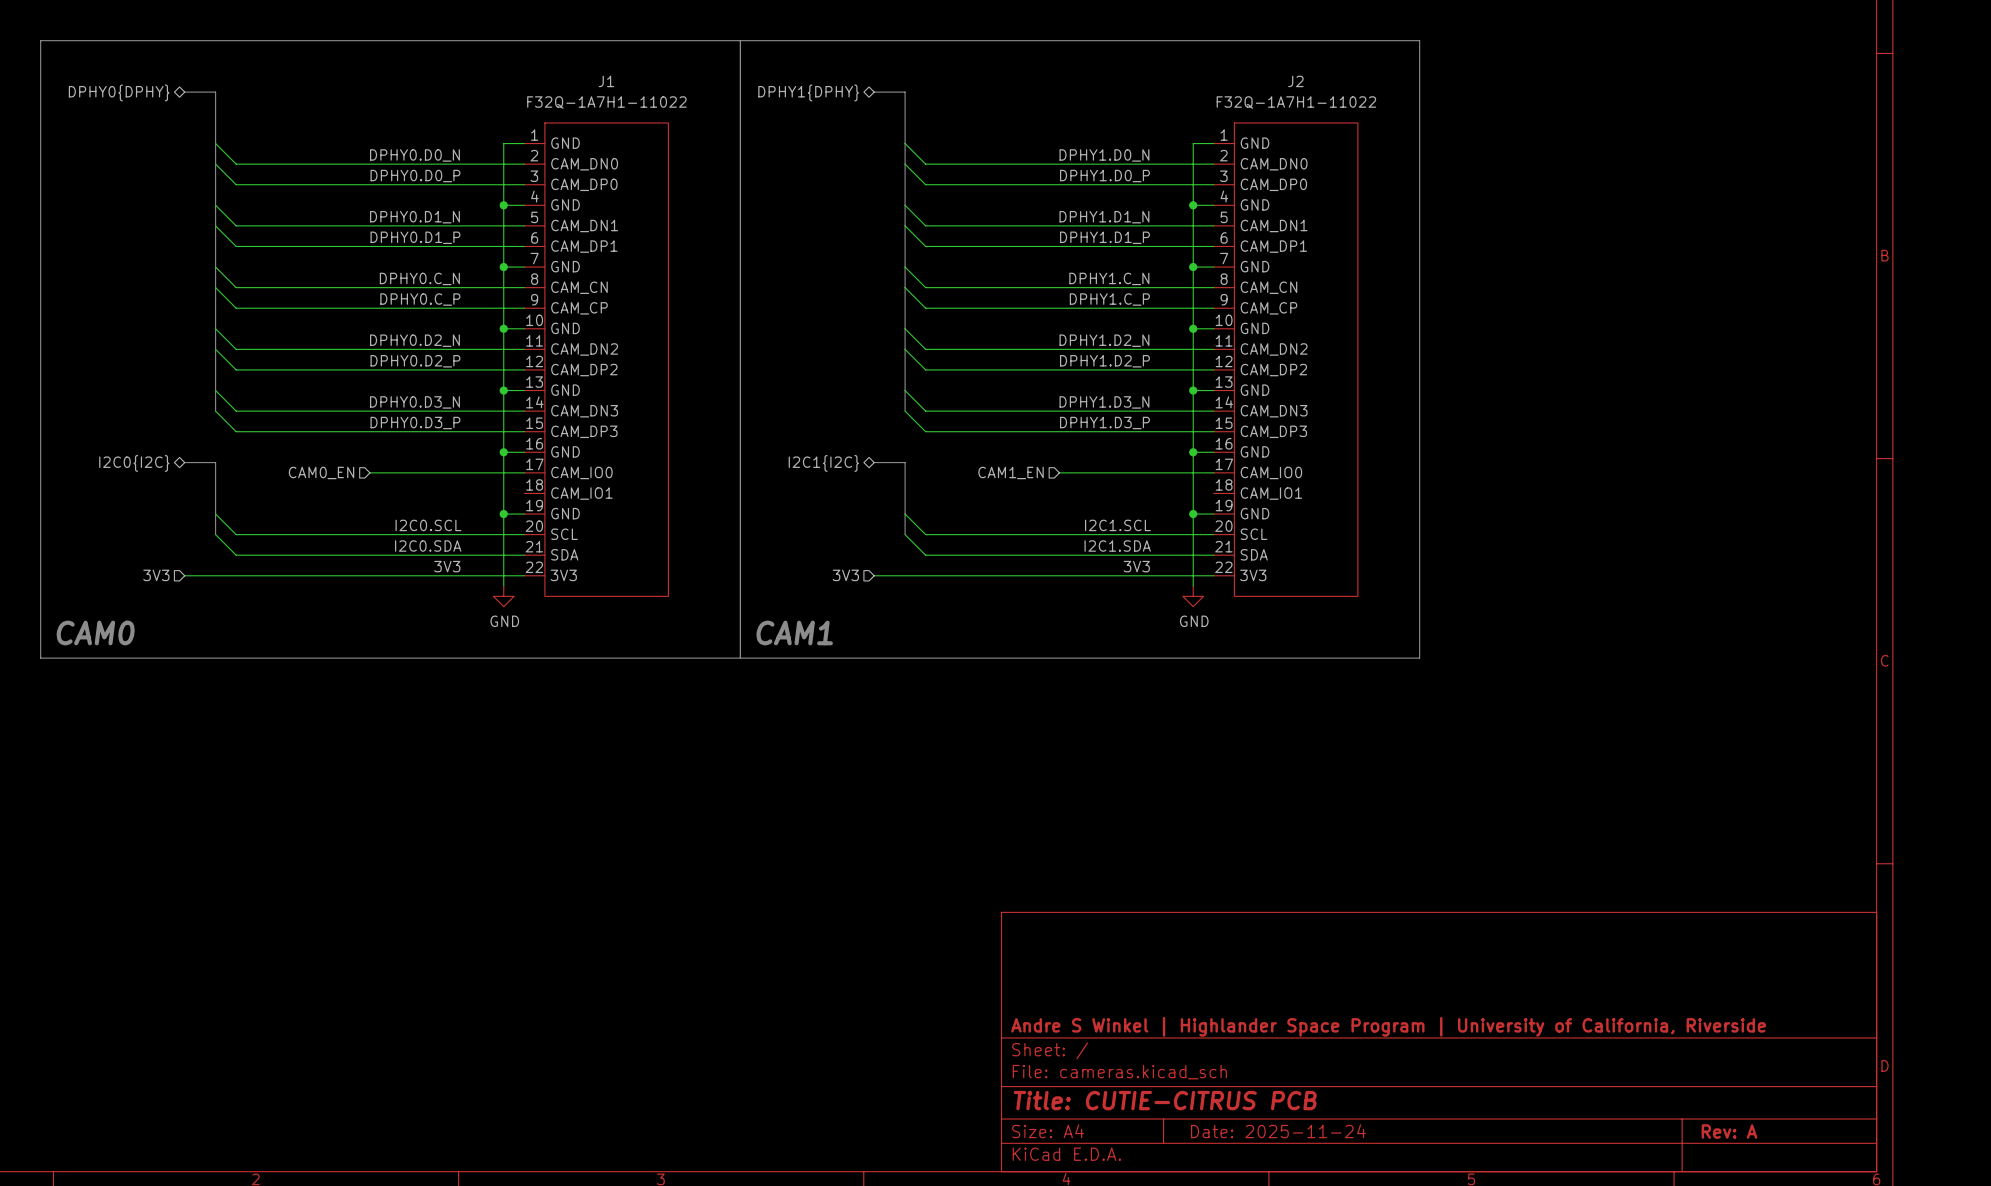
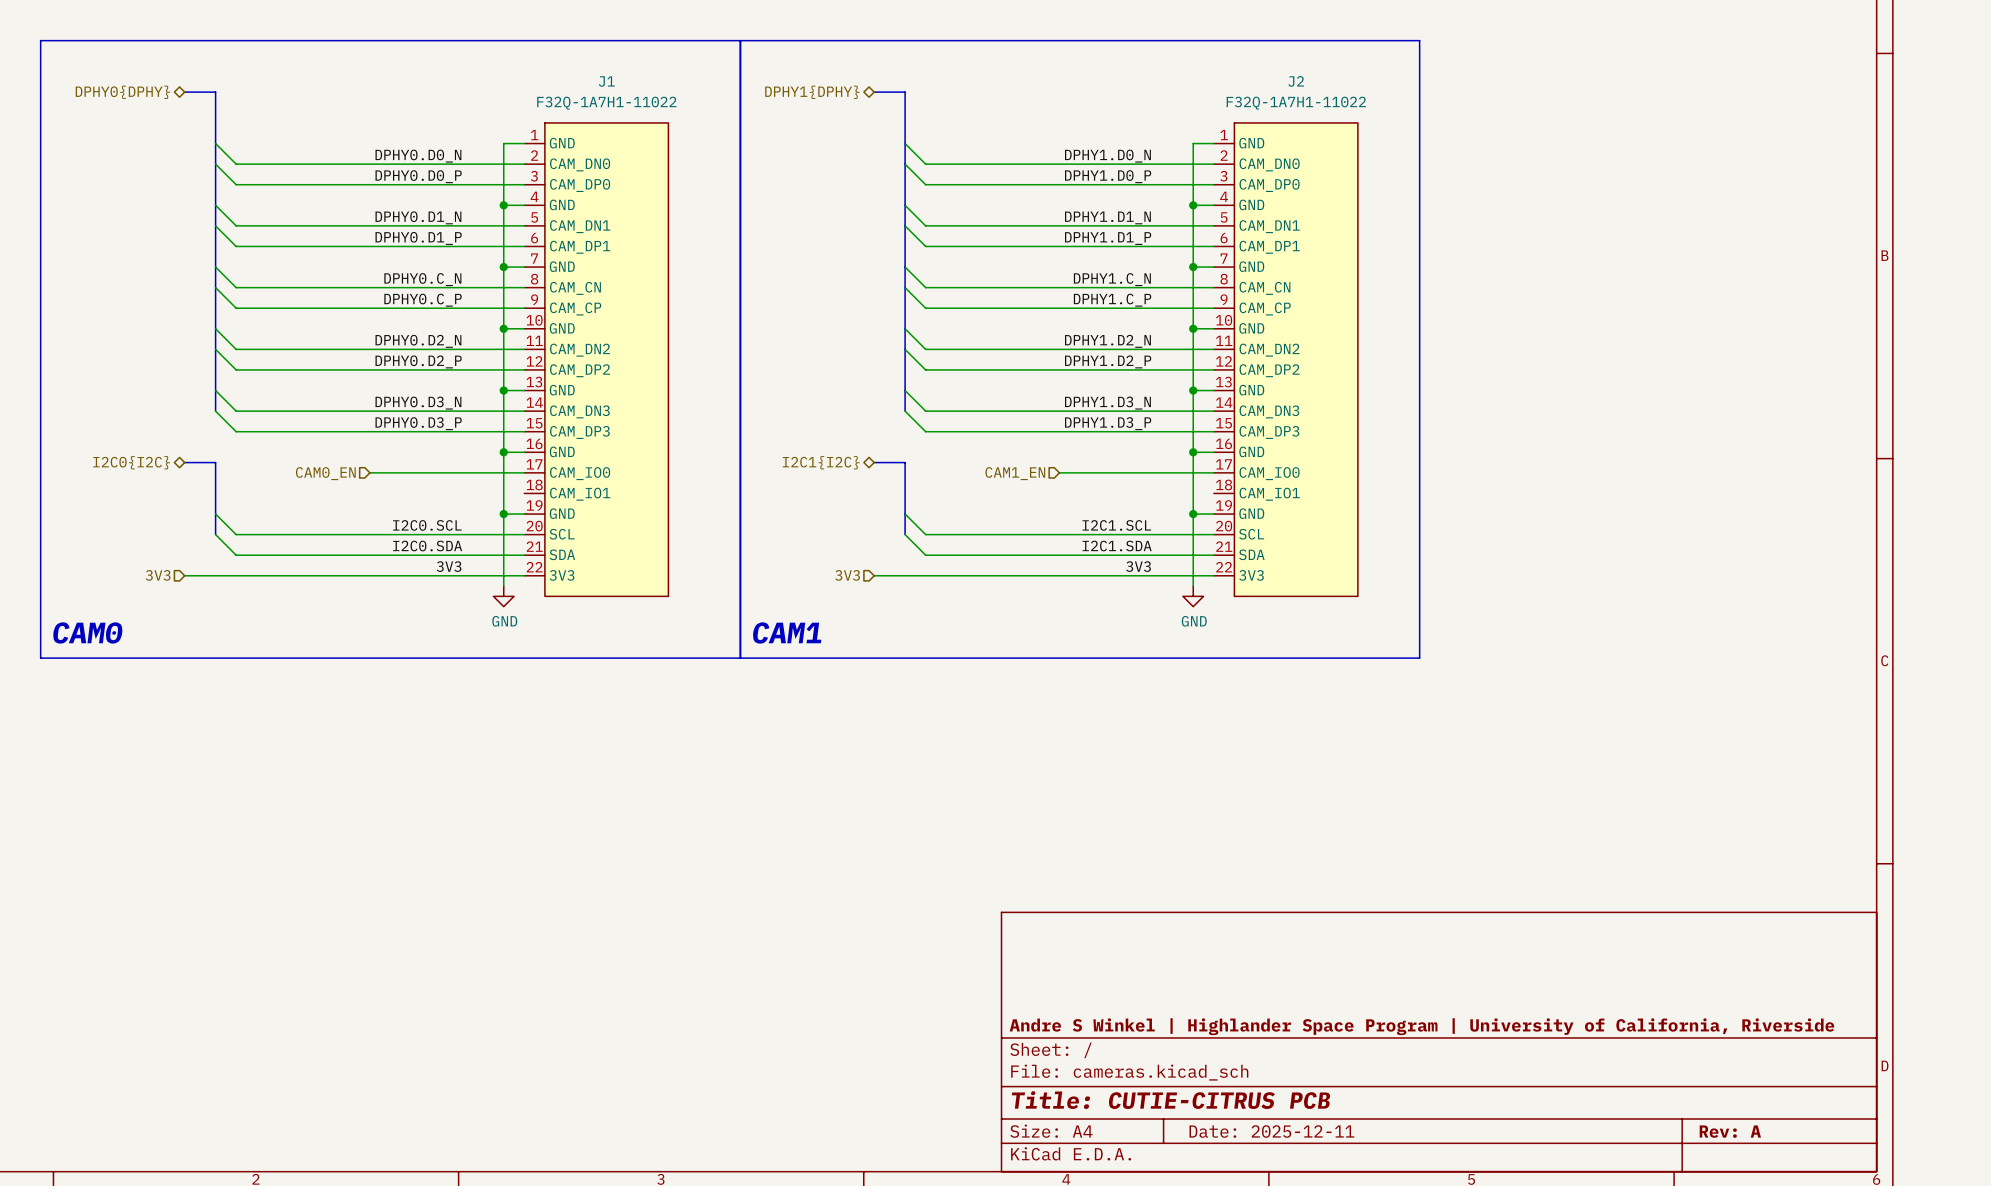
title block: Date: 2025-11-24 (1278, 1131) -> Date: 2025-12-11 (1271, 1131)

